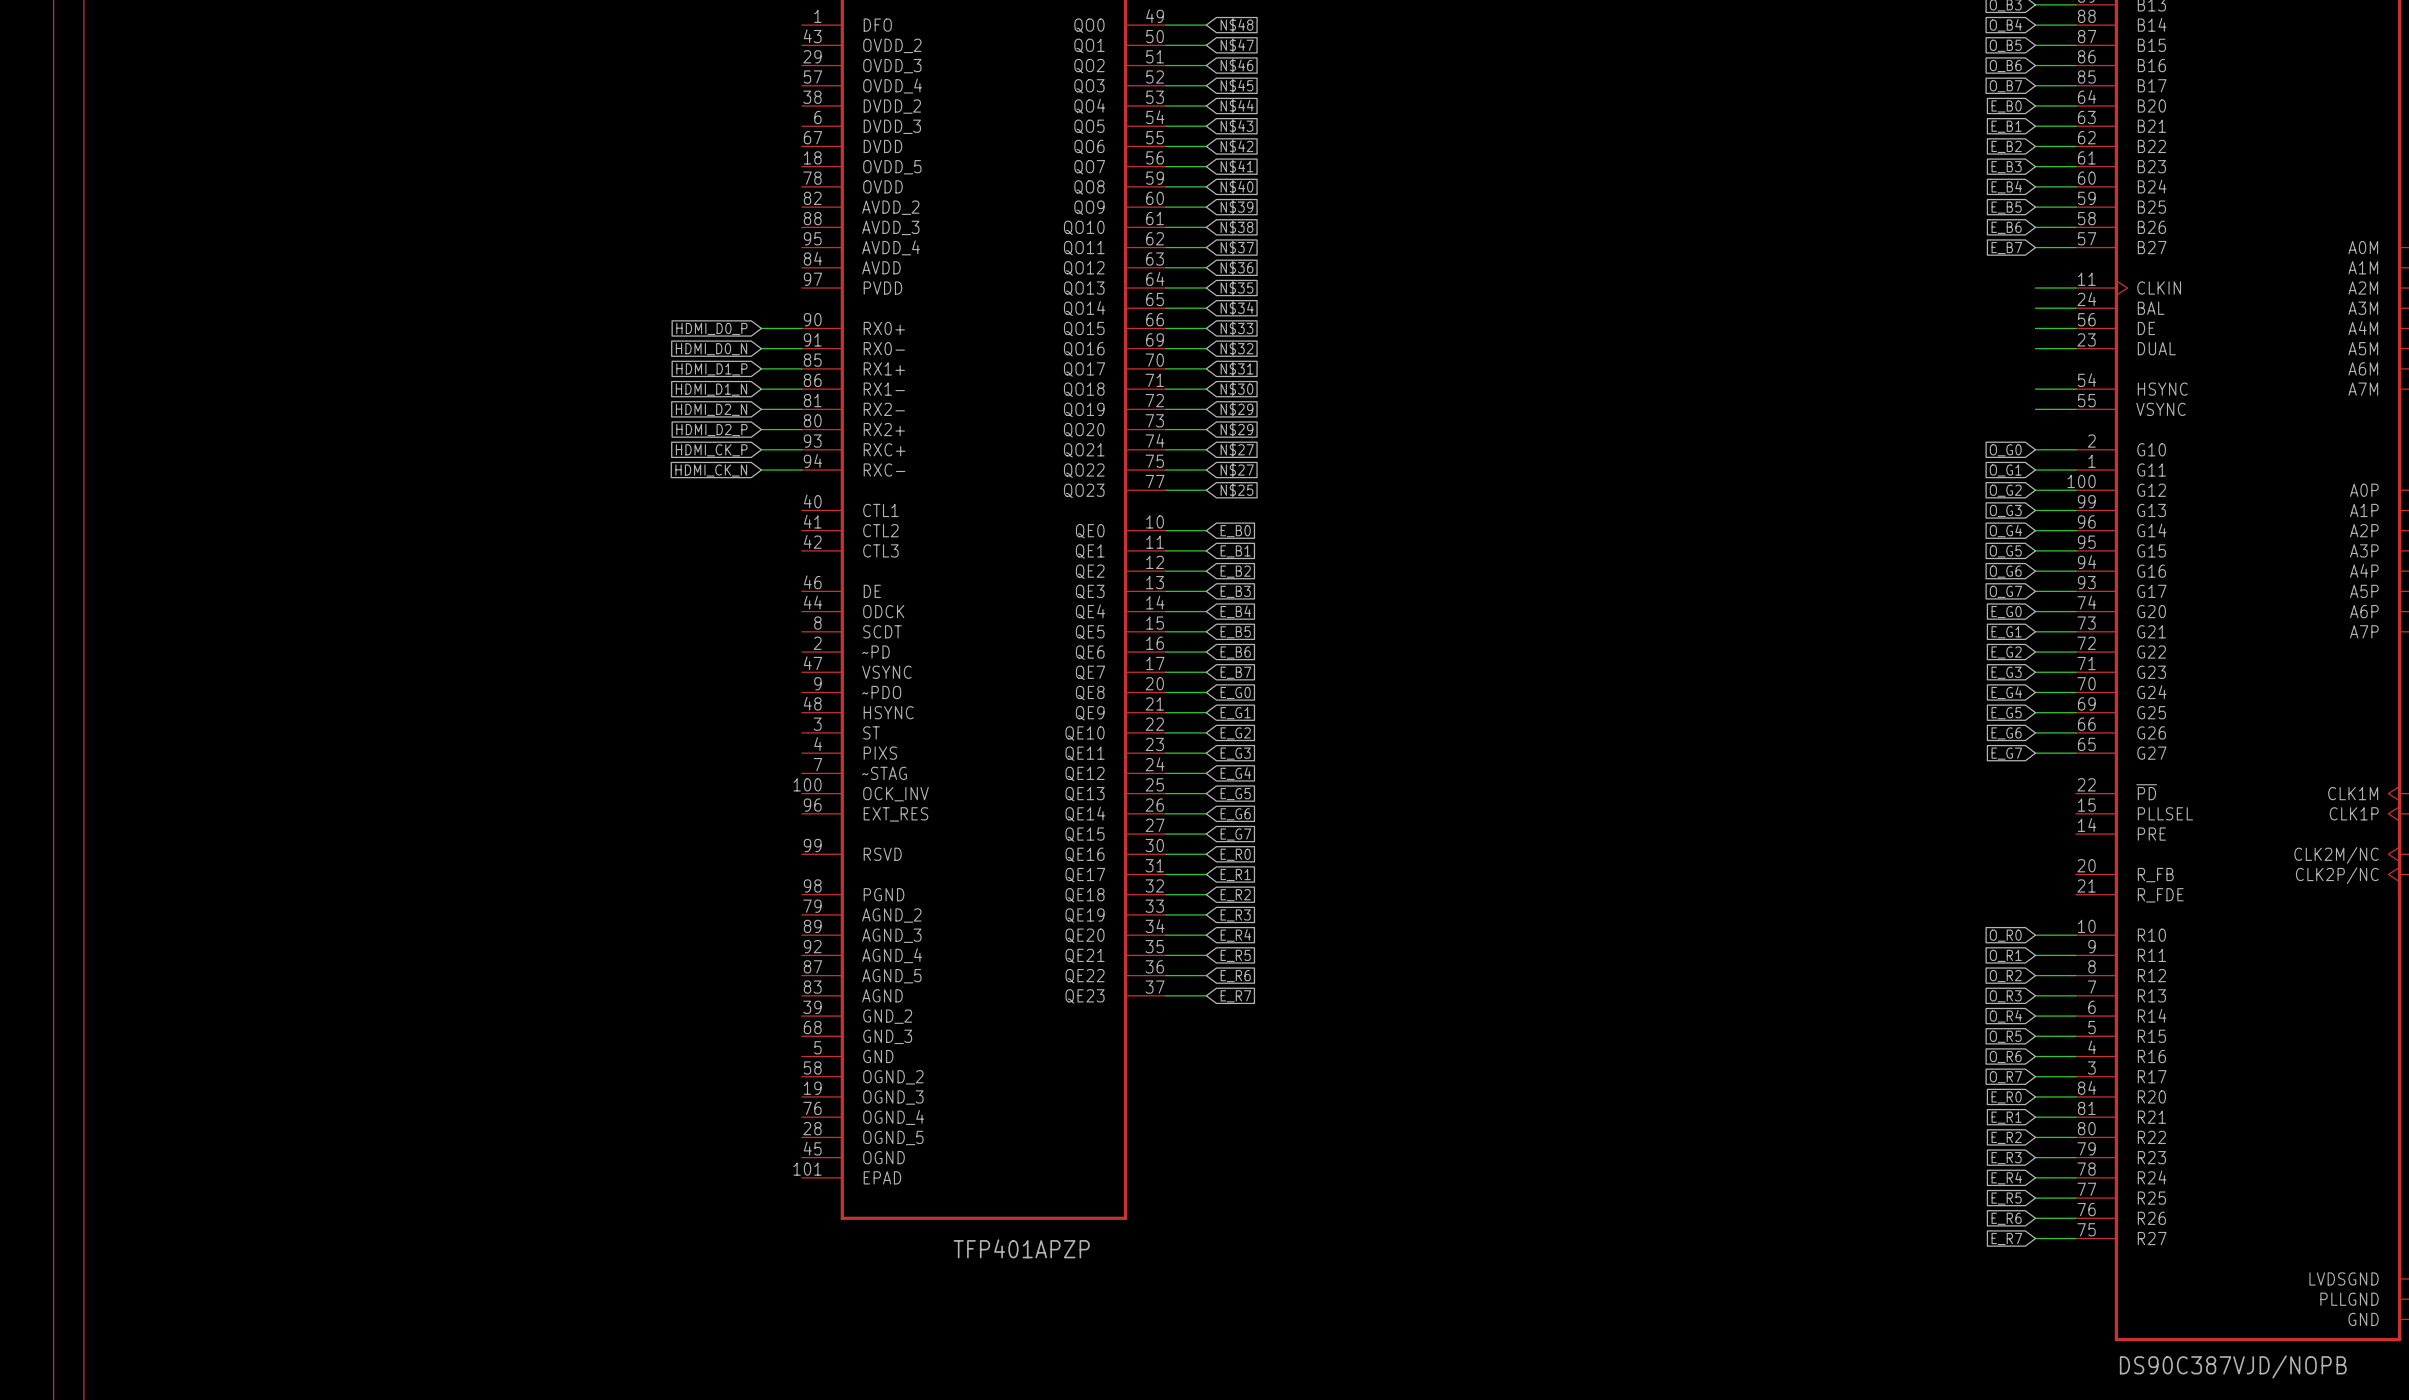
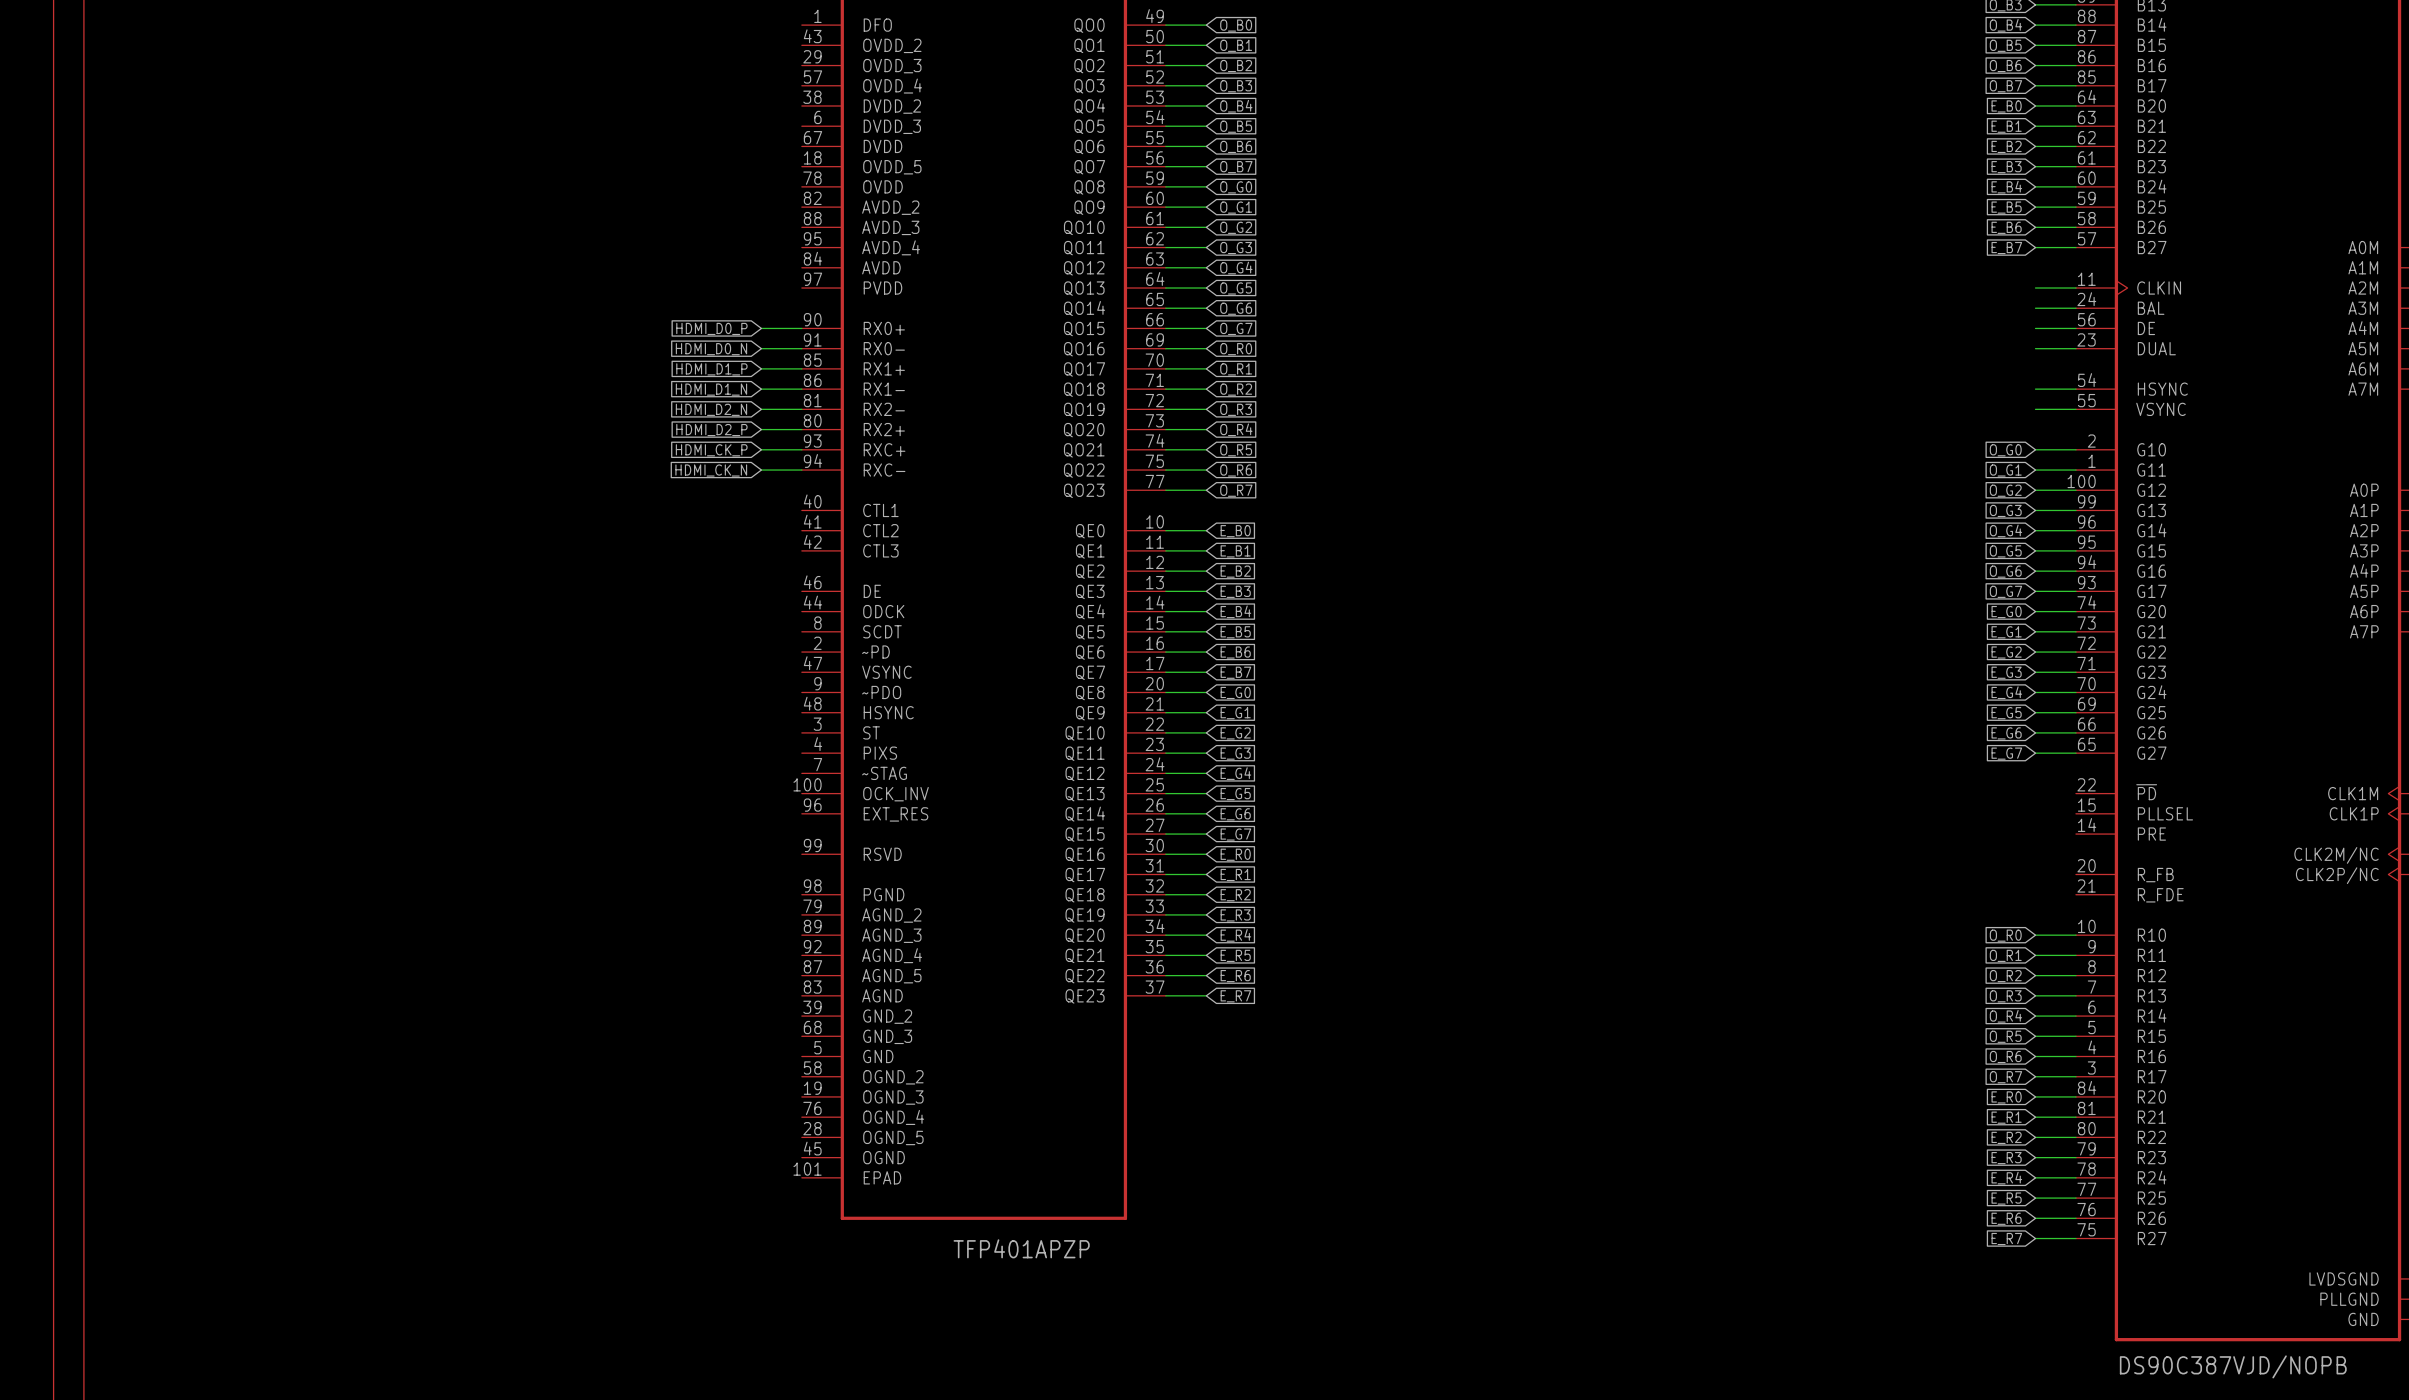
global label: N$48 (1236, 25) -> O_B0 (1236, 25)
global label: N$47 (1237, 45) -> O_B1 (1236, 45)
global label: N$46 (1236, 65) -> O_B2 (1236, 66)
global label: N$45 (1236, 85) -> O_B3 (1236, 86)
global label: N$44 (1237, 105) -> O_B4 (1236, 106)
global label: N$43 (1236, 126) -> O_B5 (1236, 126)
global label: N$42 (1236, 146) -> O_B6 (1236, 146)
global label: N$41 (1236, 166) -> O_B7 (1236, 167)
global label: N$40 (1236, 186) -> O_G0 (1236, 187)
global label: N$39 (1236, 207) -> O_G1 (1236, 207)
global label: N$38 (1236, 227) -> O_G2 (1236, 227)
global label: N$37 (1237, 247) -> O_G3 (1236, 248)
global label: N$36 (1236, 267) -> O_G4 (1236, 268)
global label: N$35 (1236, 288) -> O_G5 (1236, 288)
global label: N$34 (1237, 308) -> O_G6 (1236, 308)
global label: N$33 (1236, 328) -> O_G7 (1236, 328)
global label: N$32 (1236, 348) -> O_R0 (1236, 349)
global label: N$31 (1236, 368) -> O_R1 (1236, 369)
global label: N$30 (1236, 389) -> O_R2 (1236, 389)
global label: N$29 (1236, 409) -> O_R3 (1236, 409)
global label: N$29 (1236, 429) -> O_R4 (1236, 429)
global label: N$27 (1237, 449) -> O_R5 (1236, 450)
global label: N$27 (1237, 470) -> O_R6 (1236, 470)
global label: N$25 (1236, 490) -> O_R7 (1236, 490)

